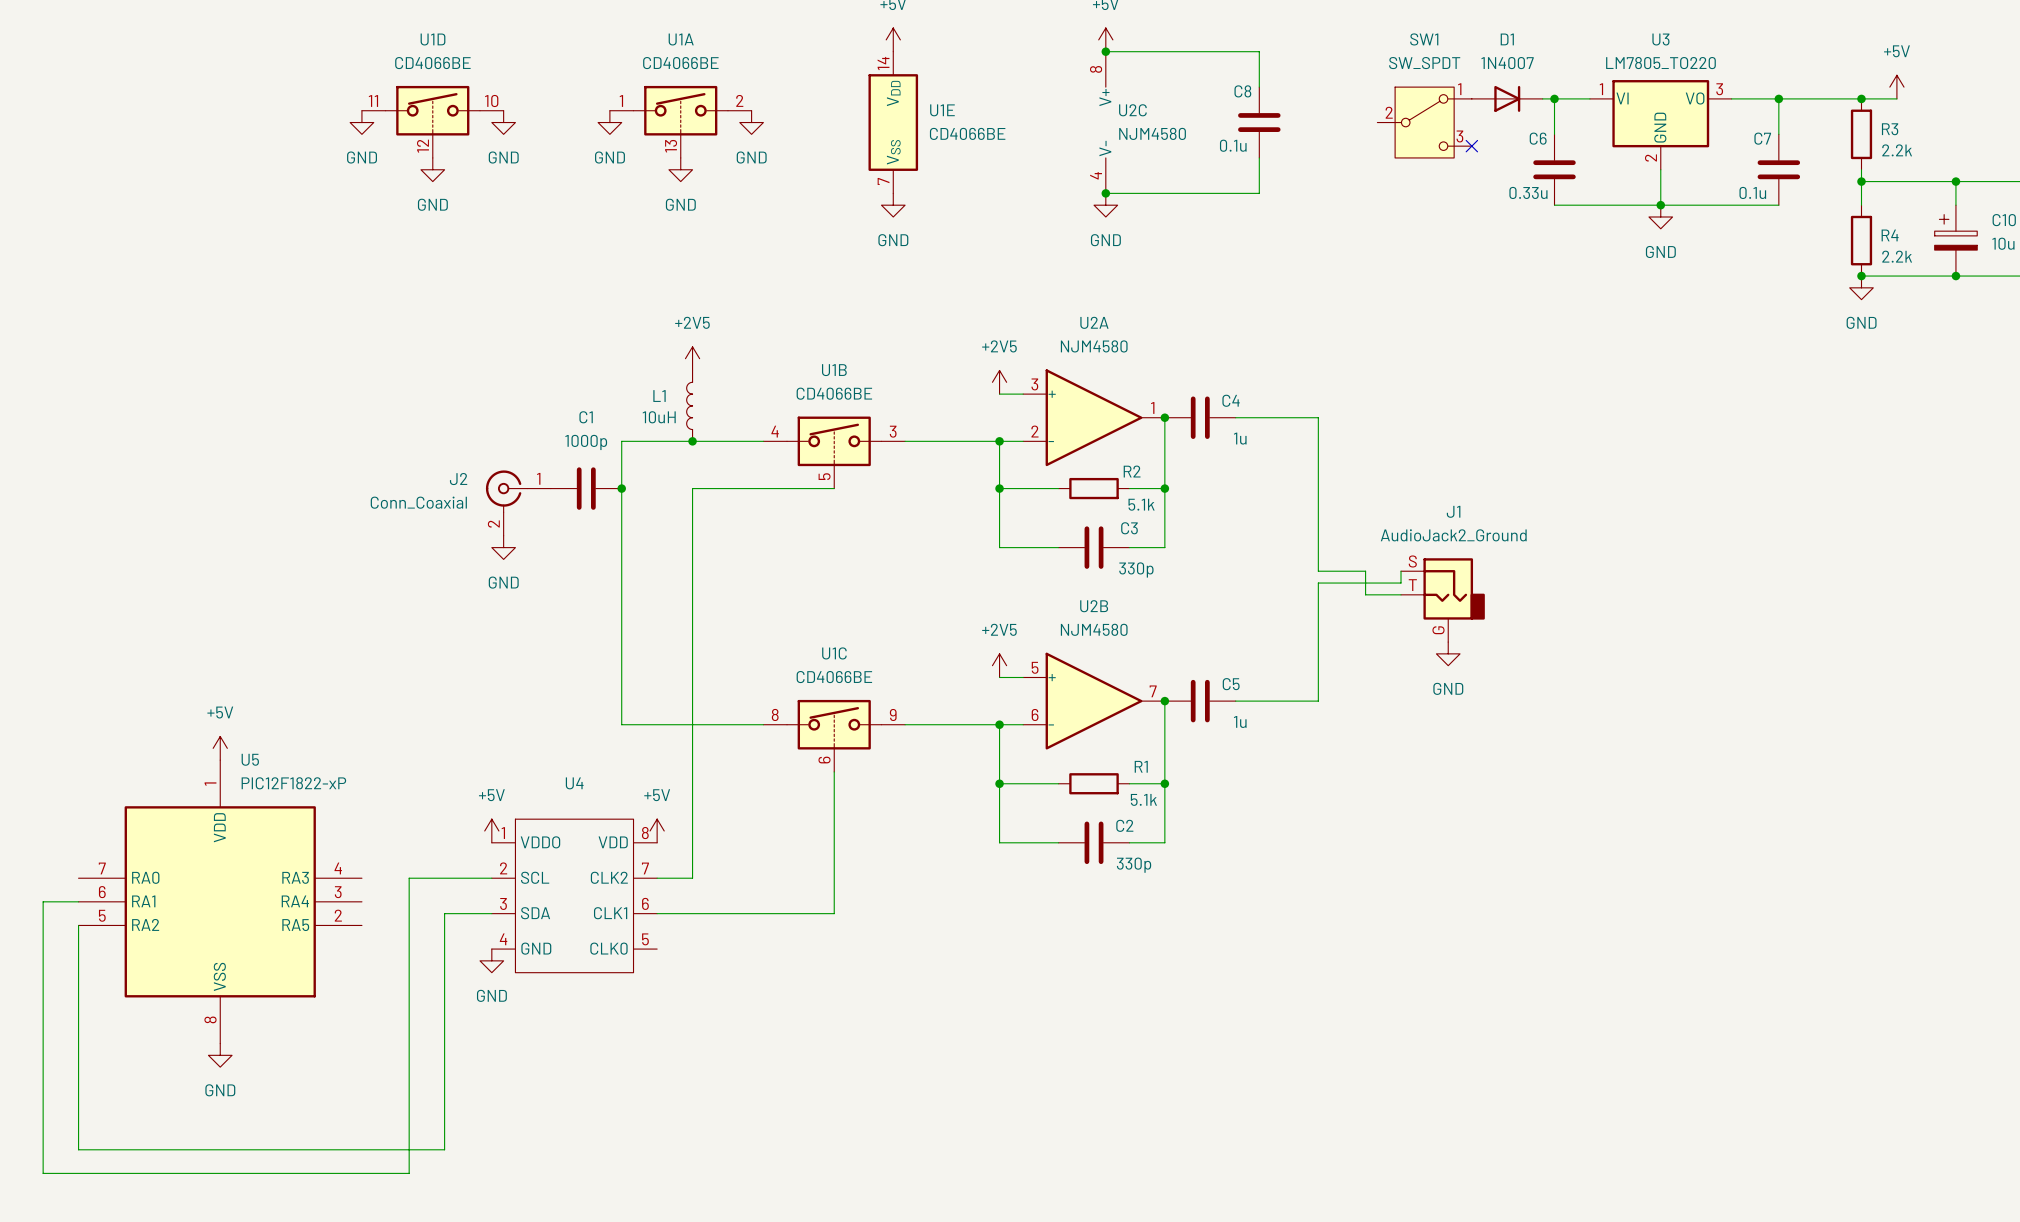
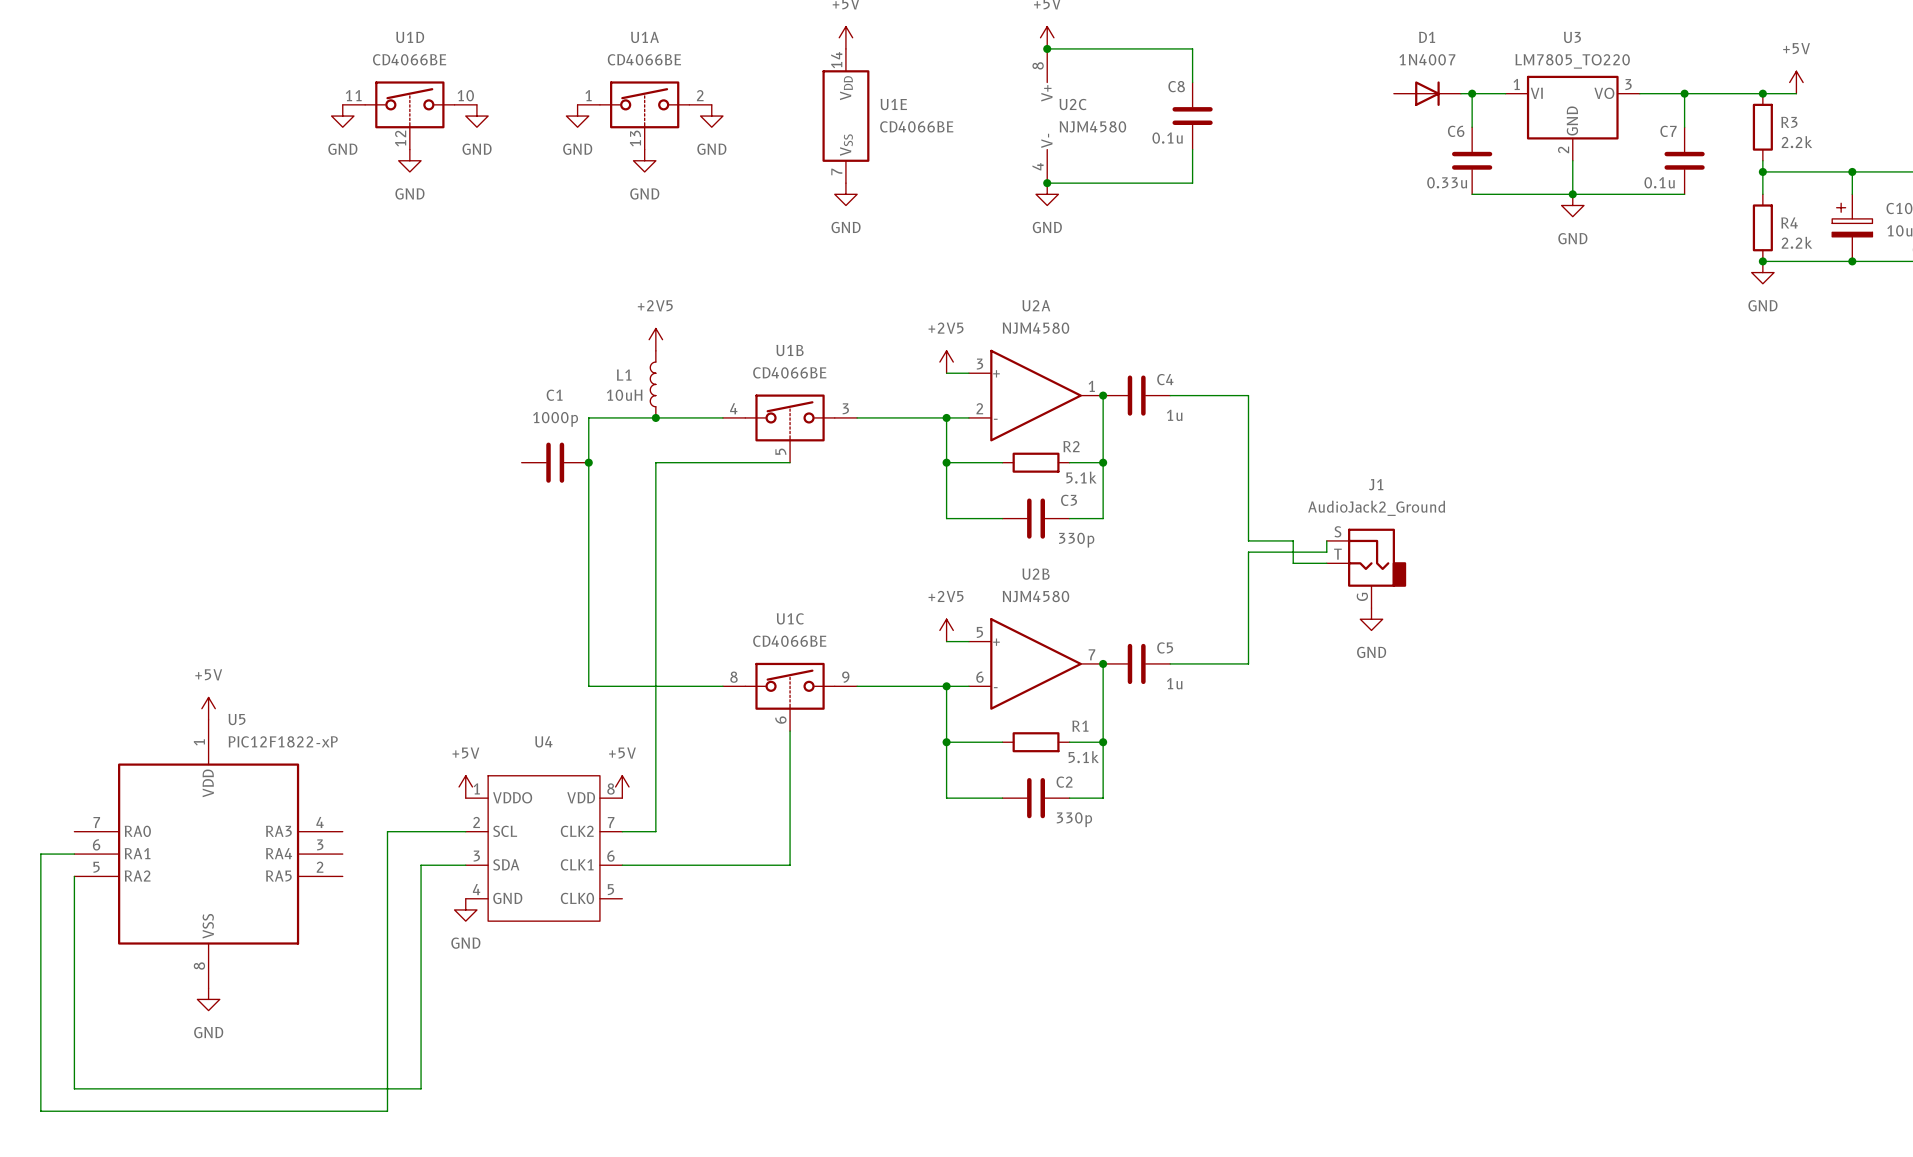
SW1: SW_SPDT (1424, 122) -> none
no-connect mark: (1471, 146) -> none
J2: Conn_Coaxial (518, 503) -> none
power symbol: GND (503, 547) -> none

